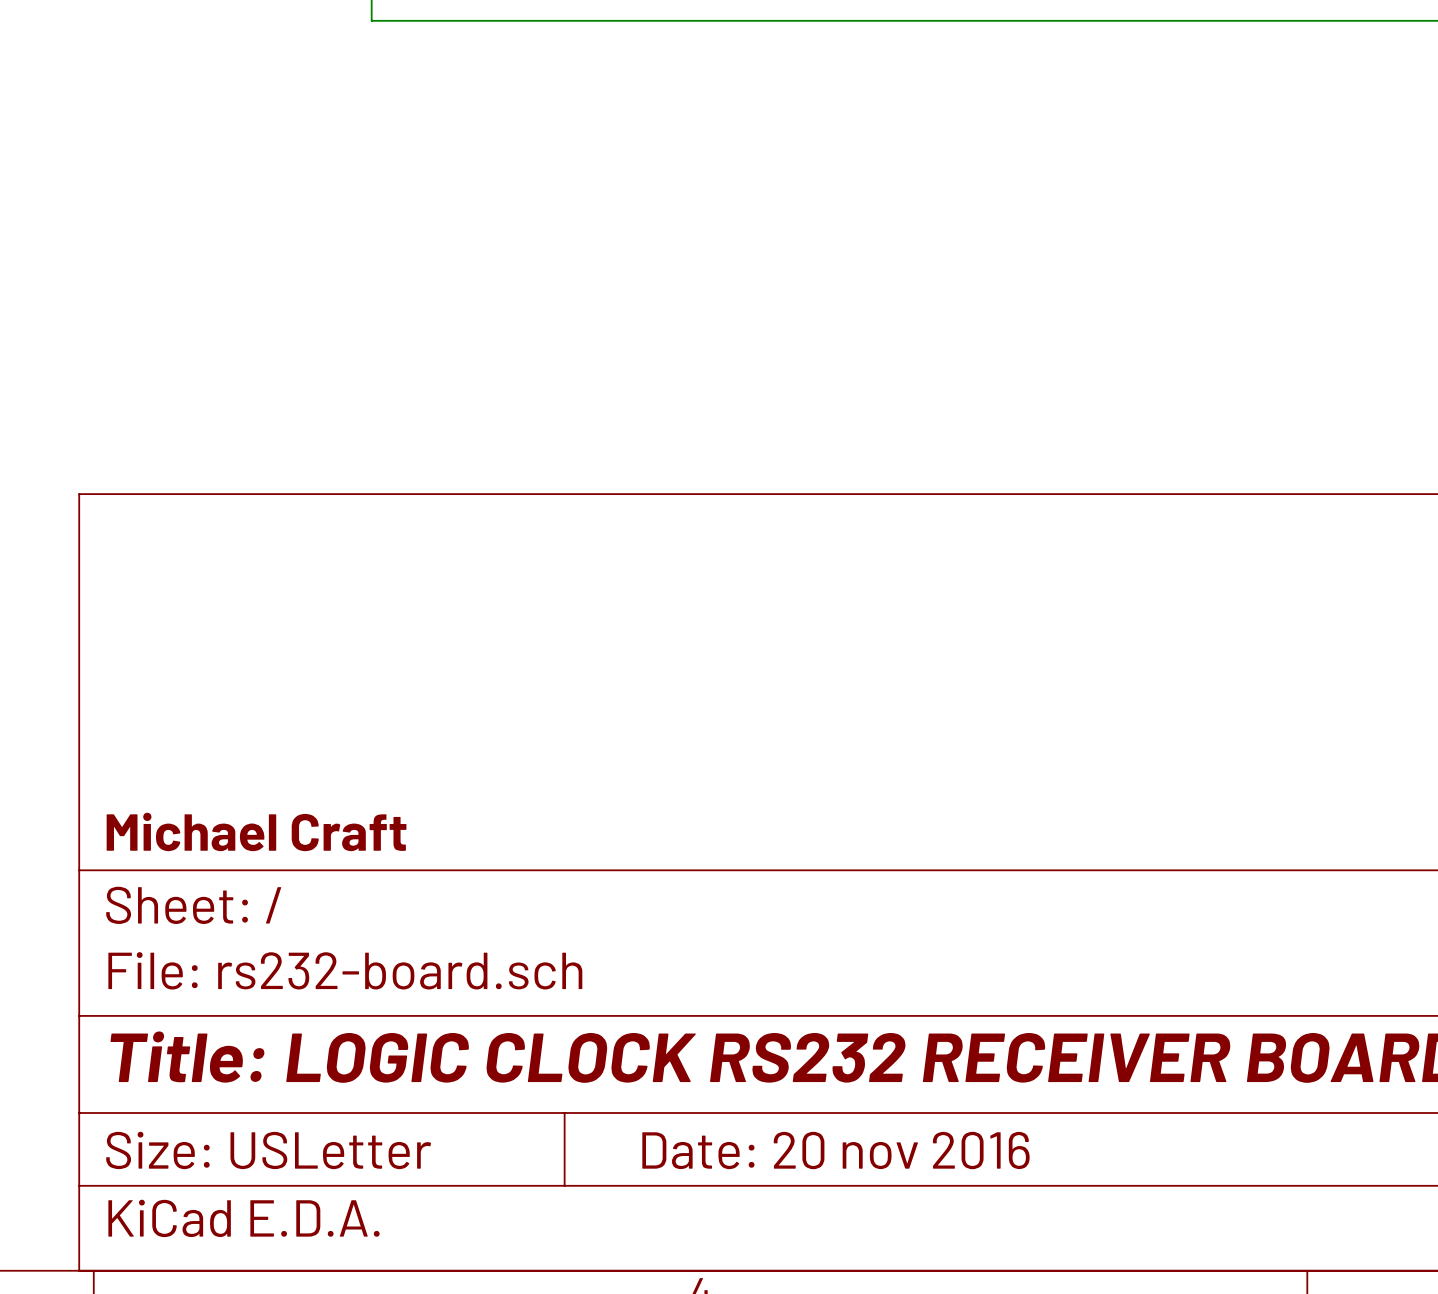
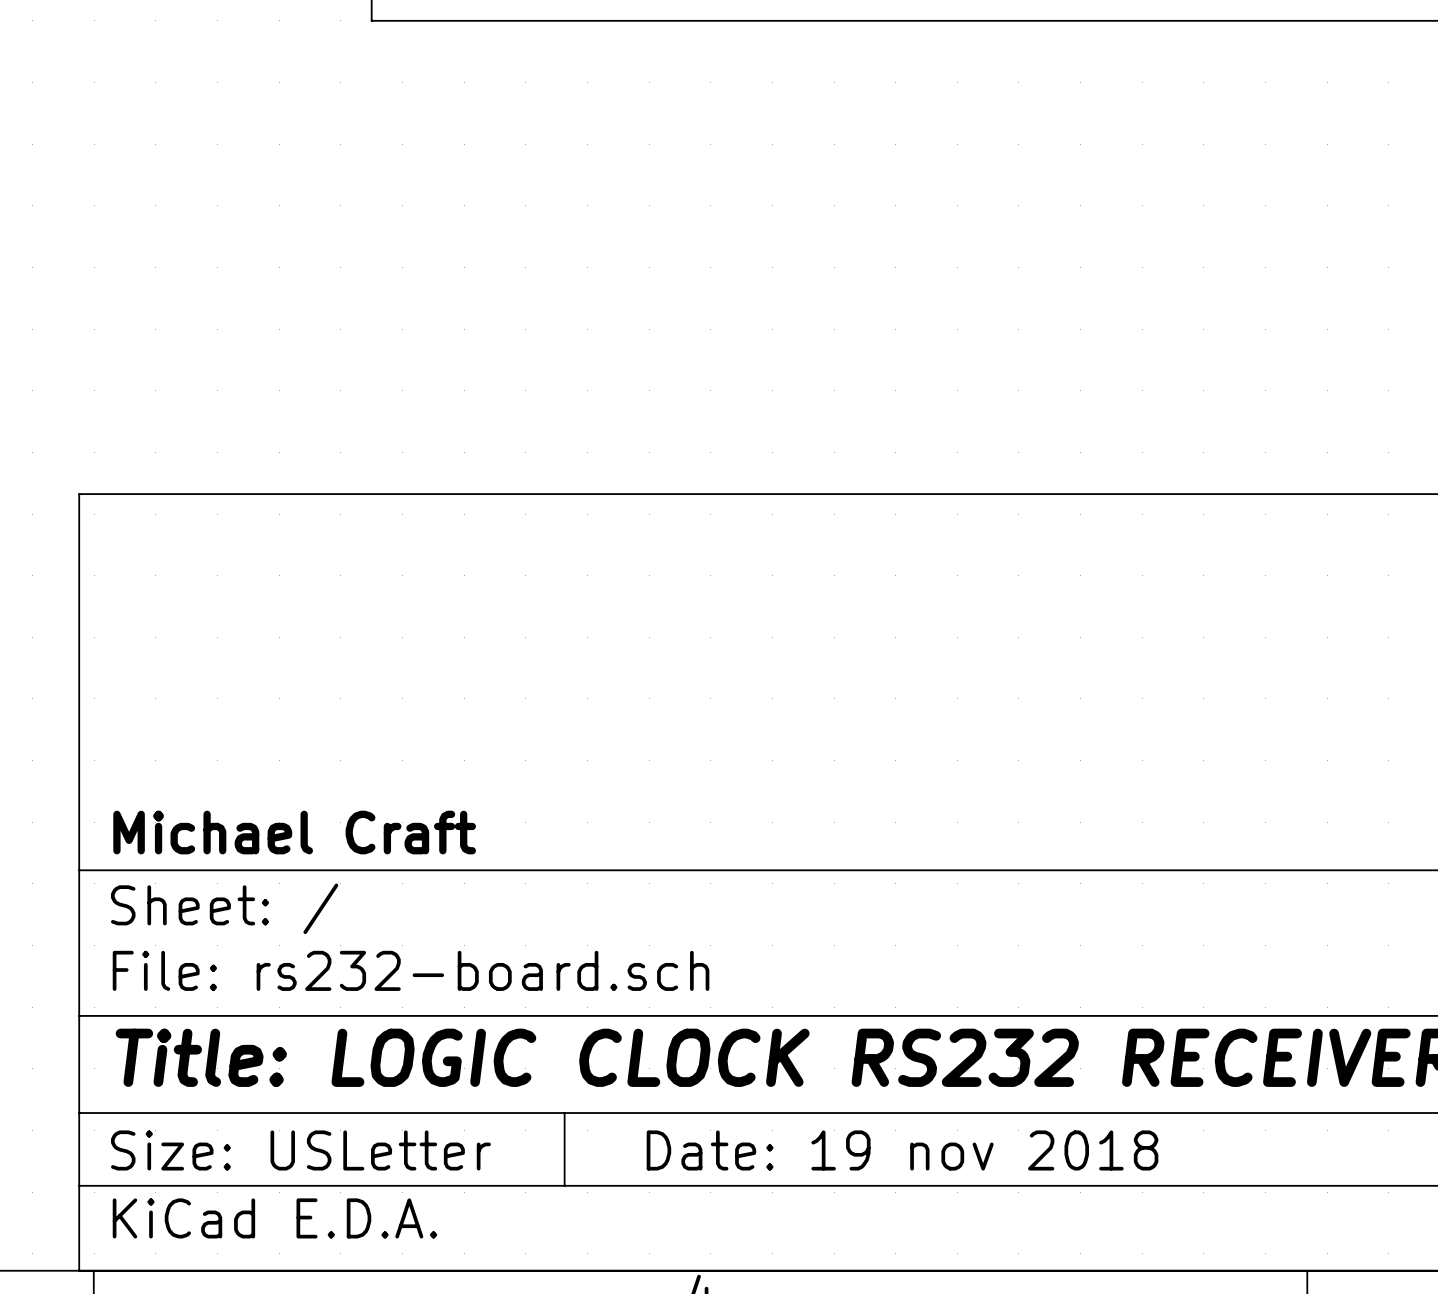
title block: Date: 20 nov 2016 (835, 1150) -> Date: 19 nov 2018 (902, 1150)

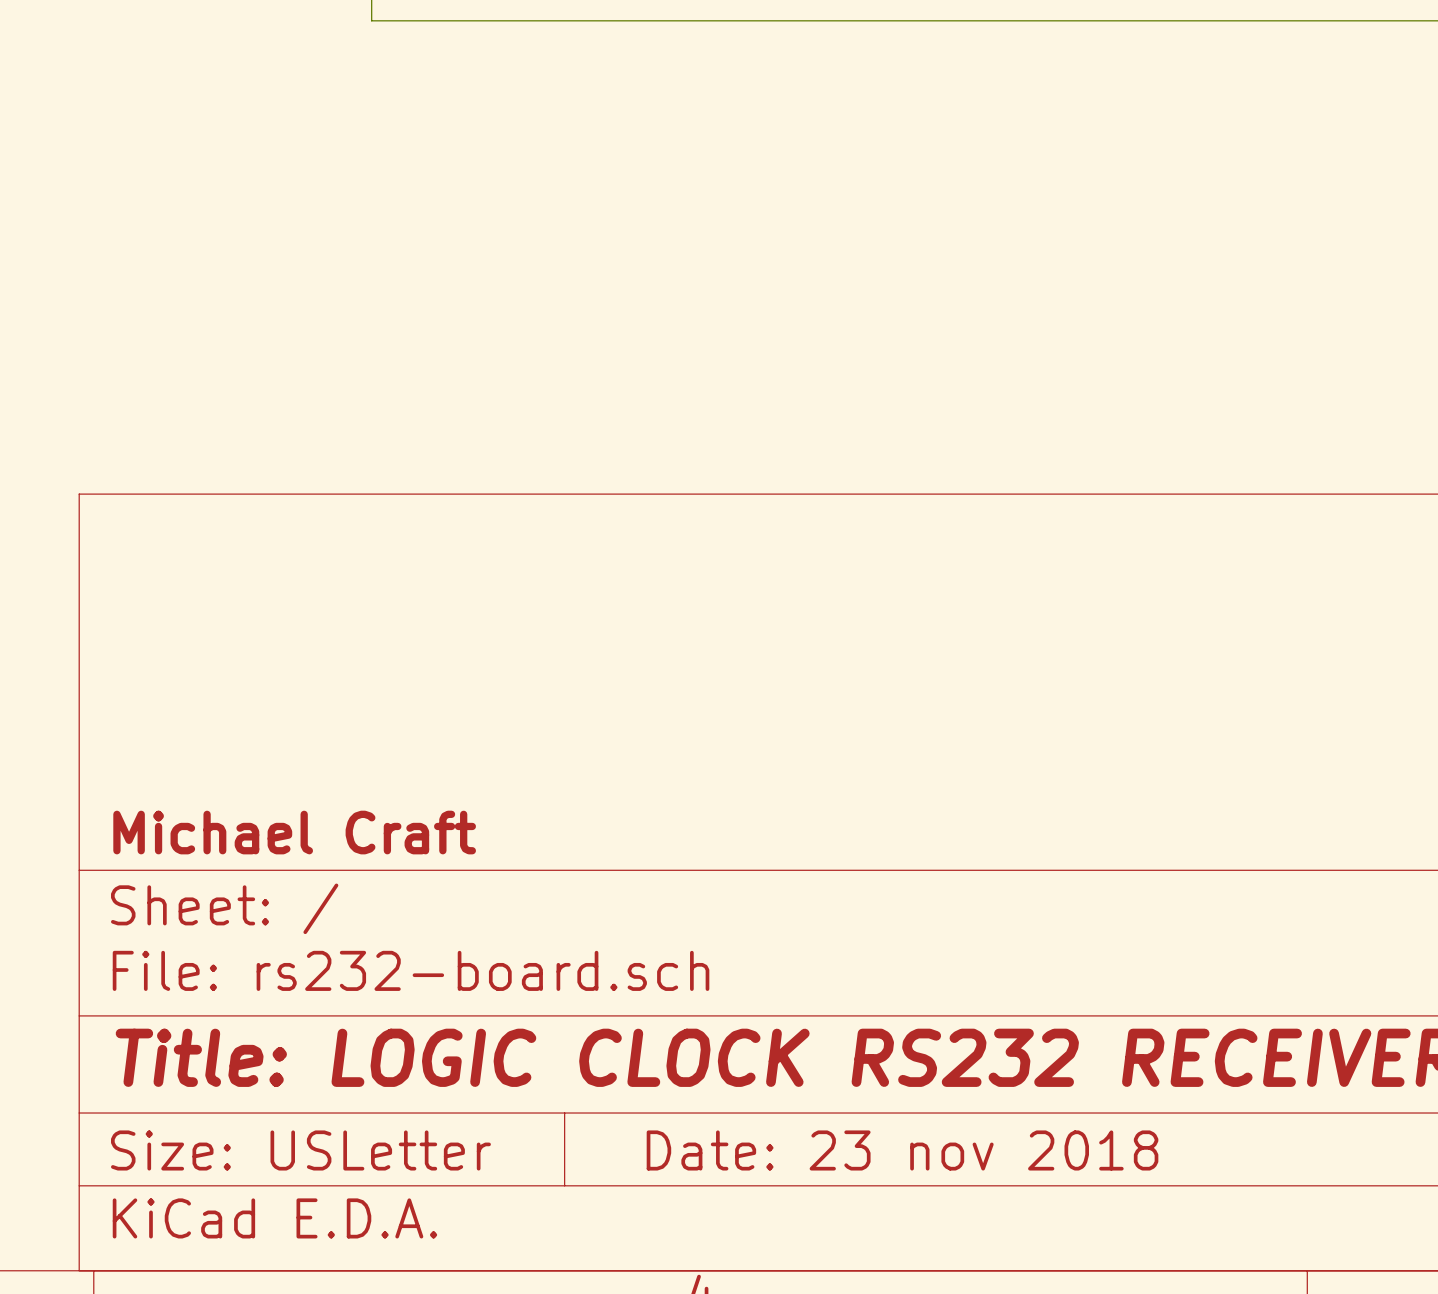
title block: Date: 19 nov 2018 (902, 1150) -> Date: 23 nov 2018 (902, 1150)

